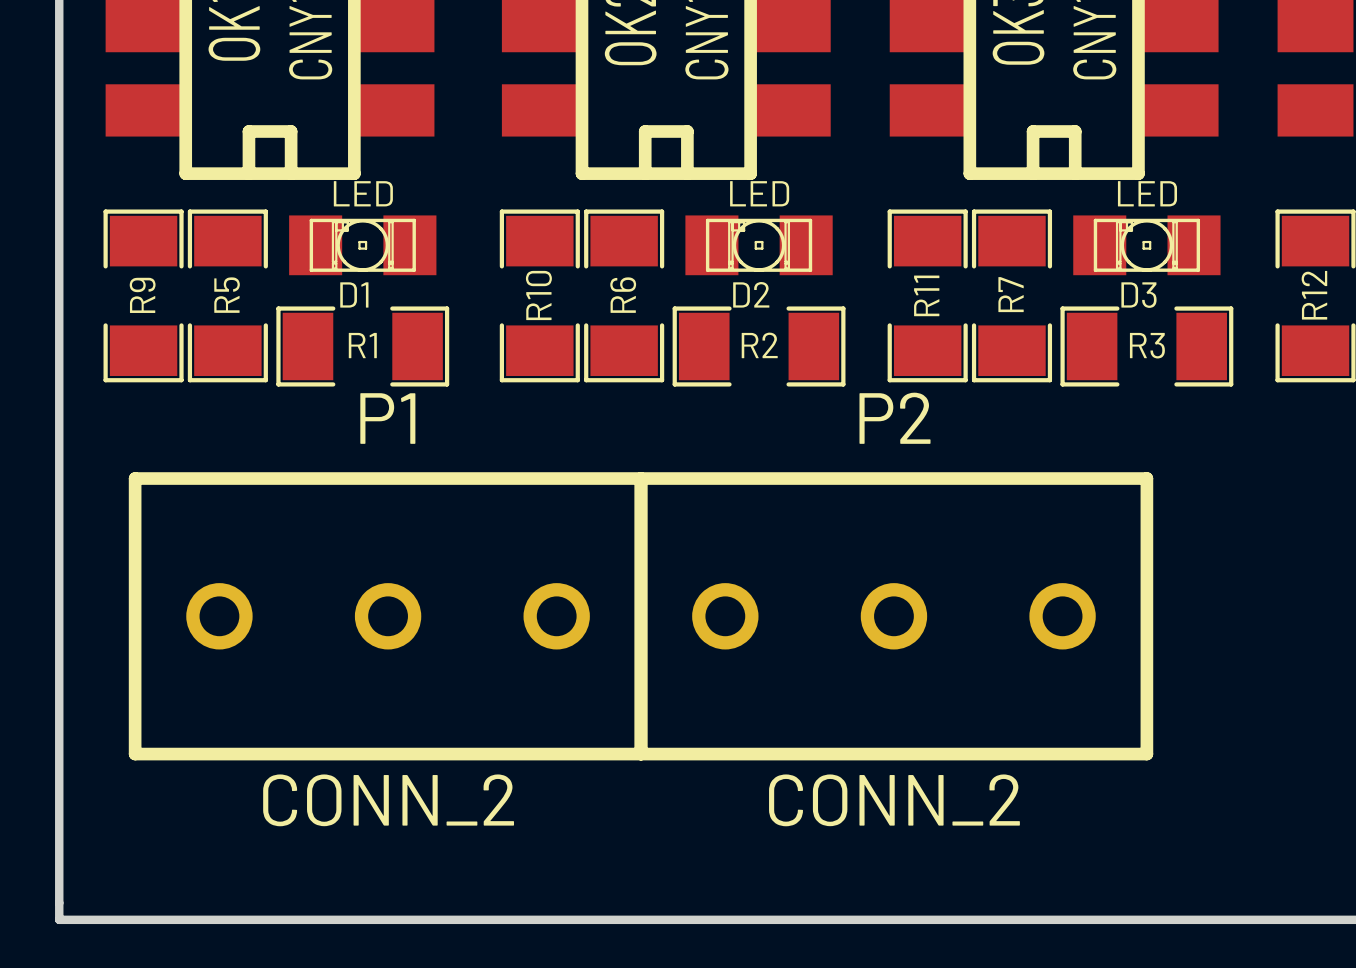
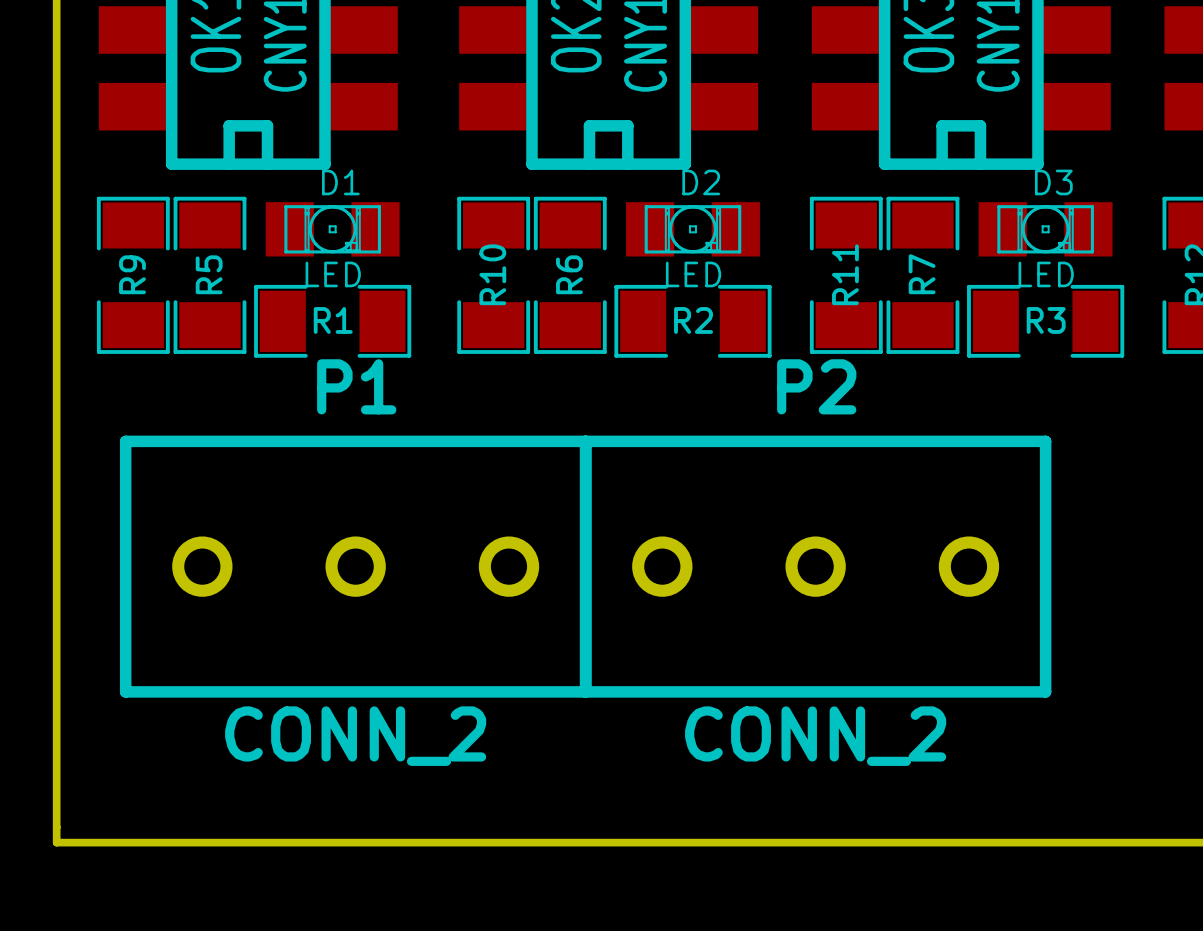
D1 rotation: 0° (362, 245) -> 180° (332, 229)
D2 rotation: 0° (759, 245) -> 180° (692, 229)
D3 rotation: 0° (1146, 245) -> 180° (1045, 229)

